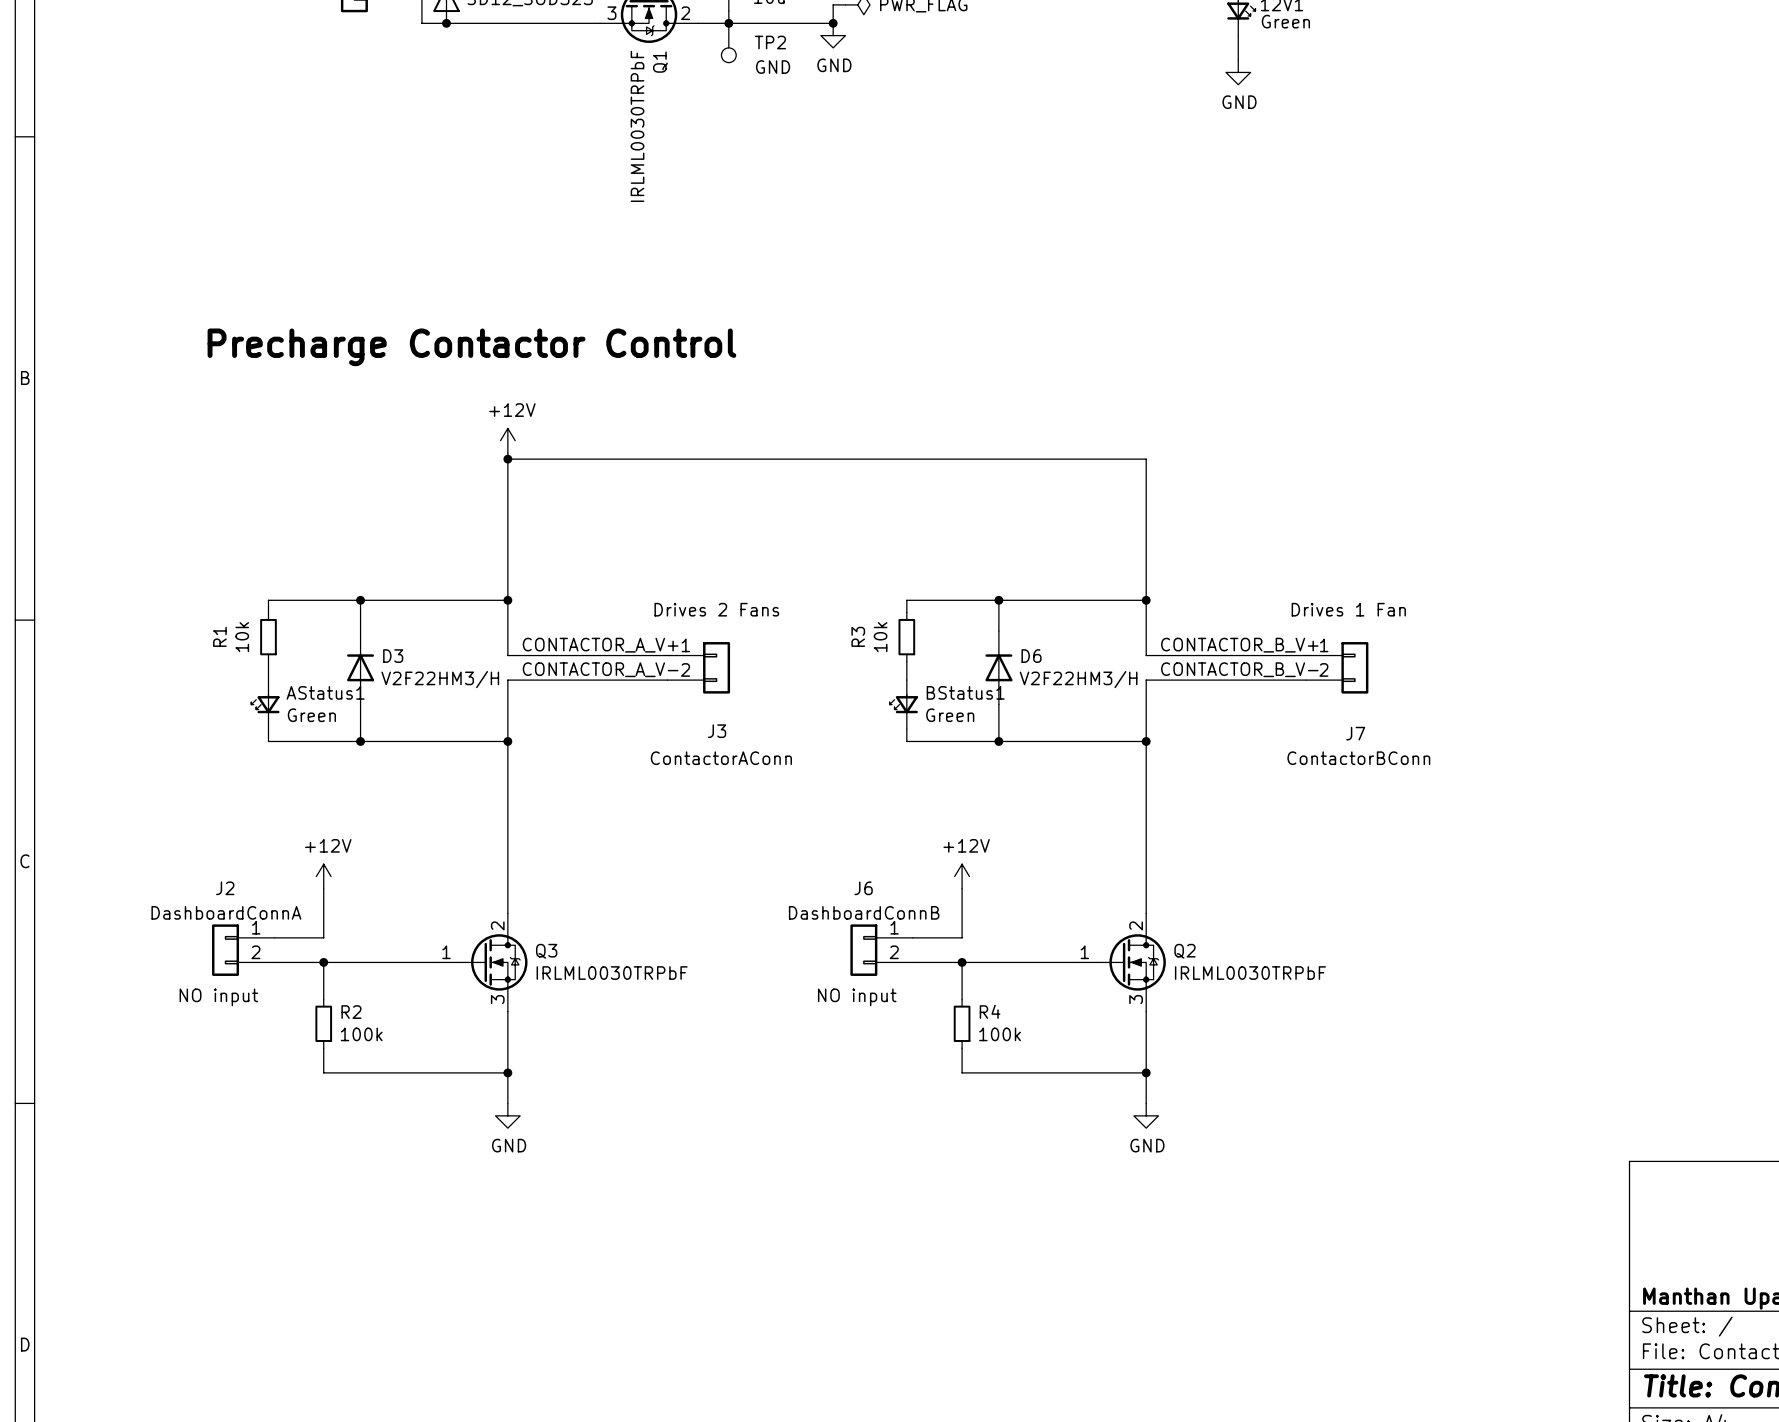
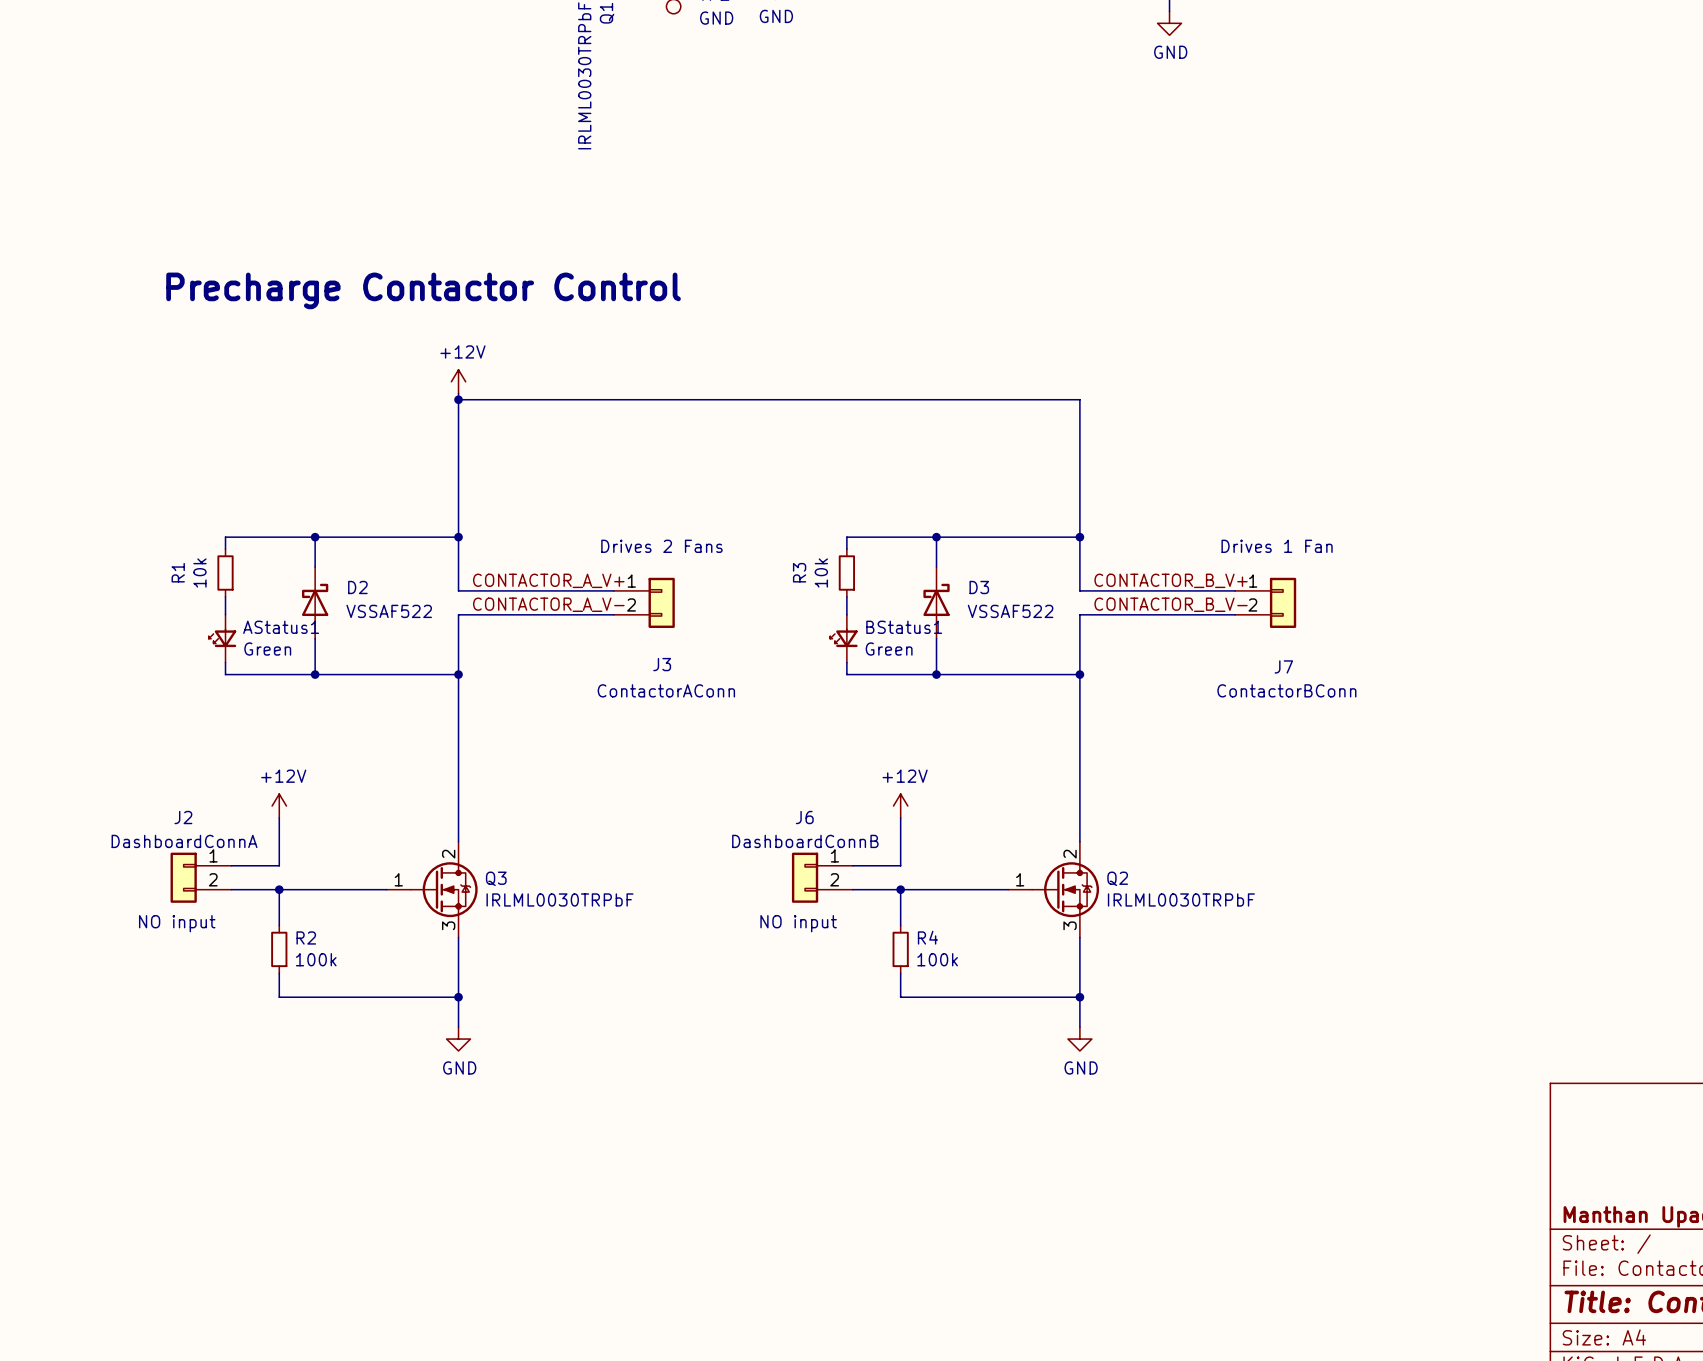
D3 symbol: [347, 630, 375, 705] -> [923, 567, 950, 639]
D2: none -> VSSAF522 (315, 602)
D6: V2F22HM3/H (998, 667) -> none
D3 value: V2F22HM3/H (440, 679) -> VSSAF522 (1010, 611)

